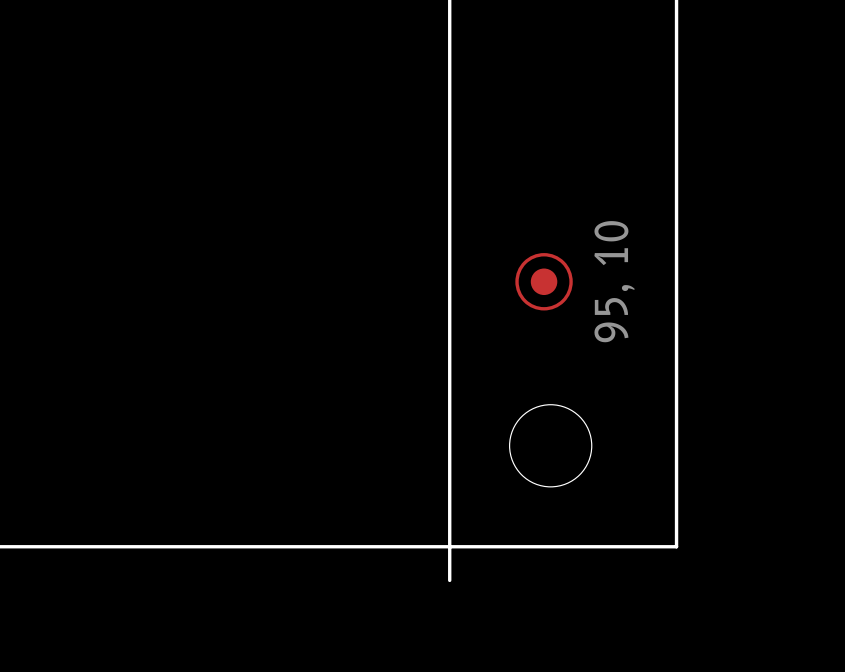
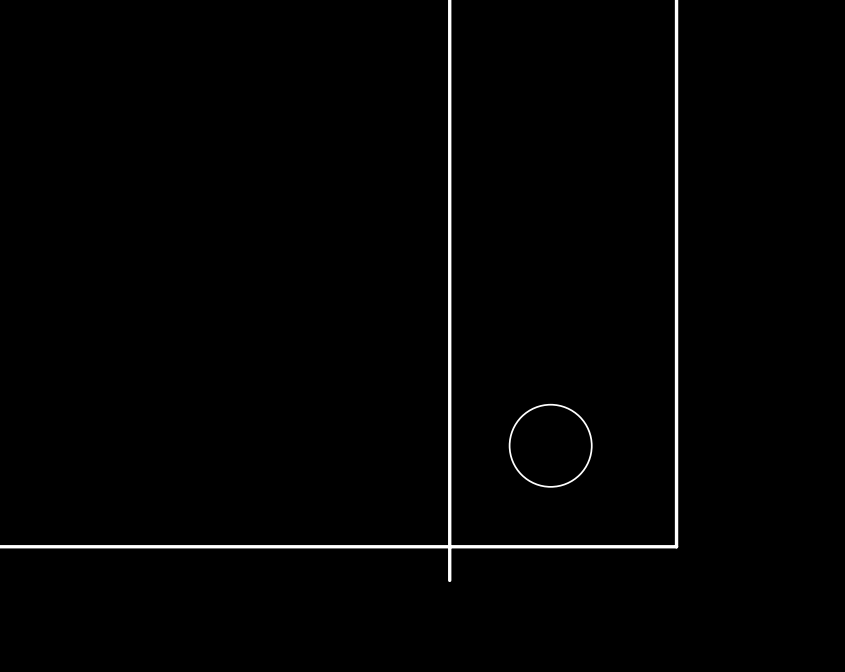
part: (544, 281) -> none
text: 95, 10 (614, 281) -> none

